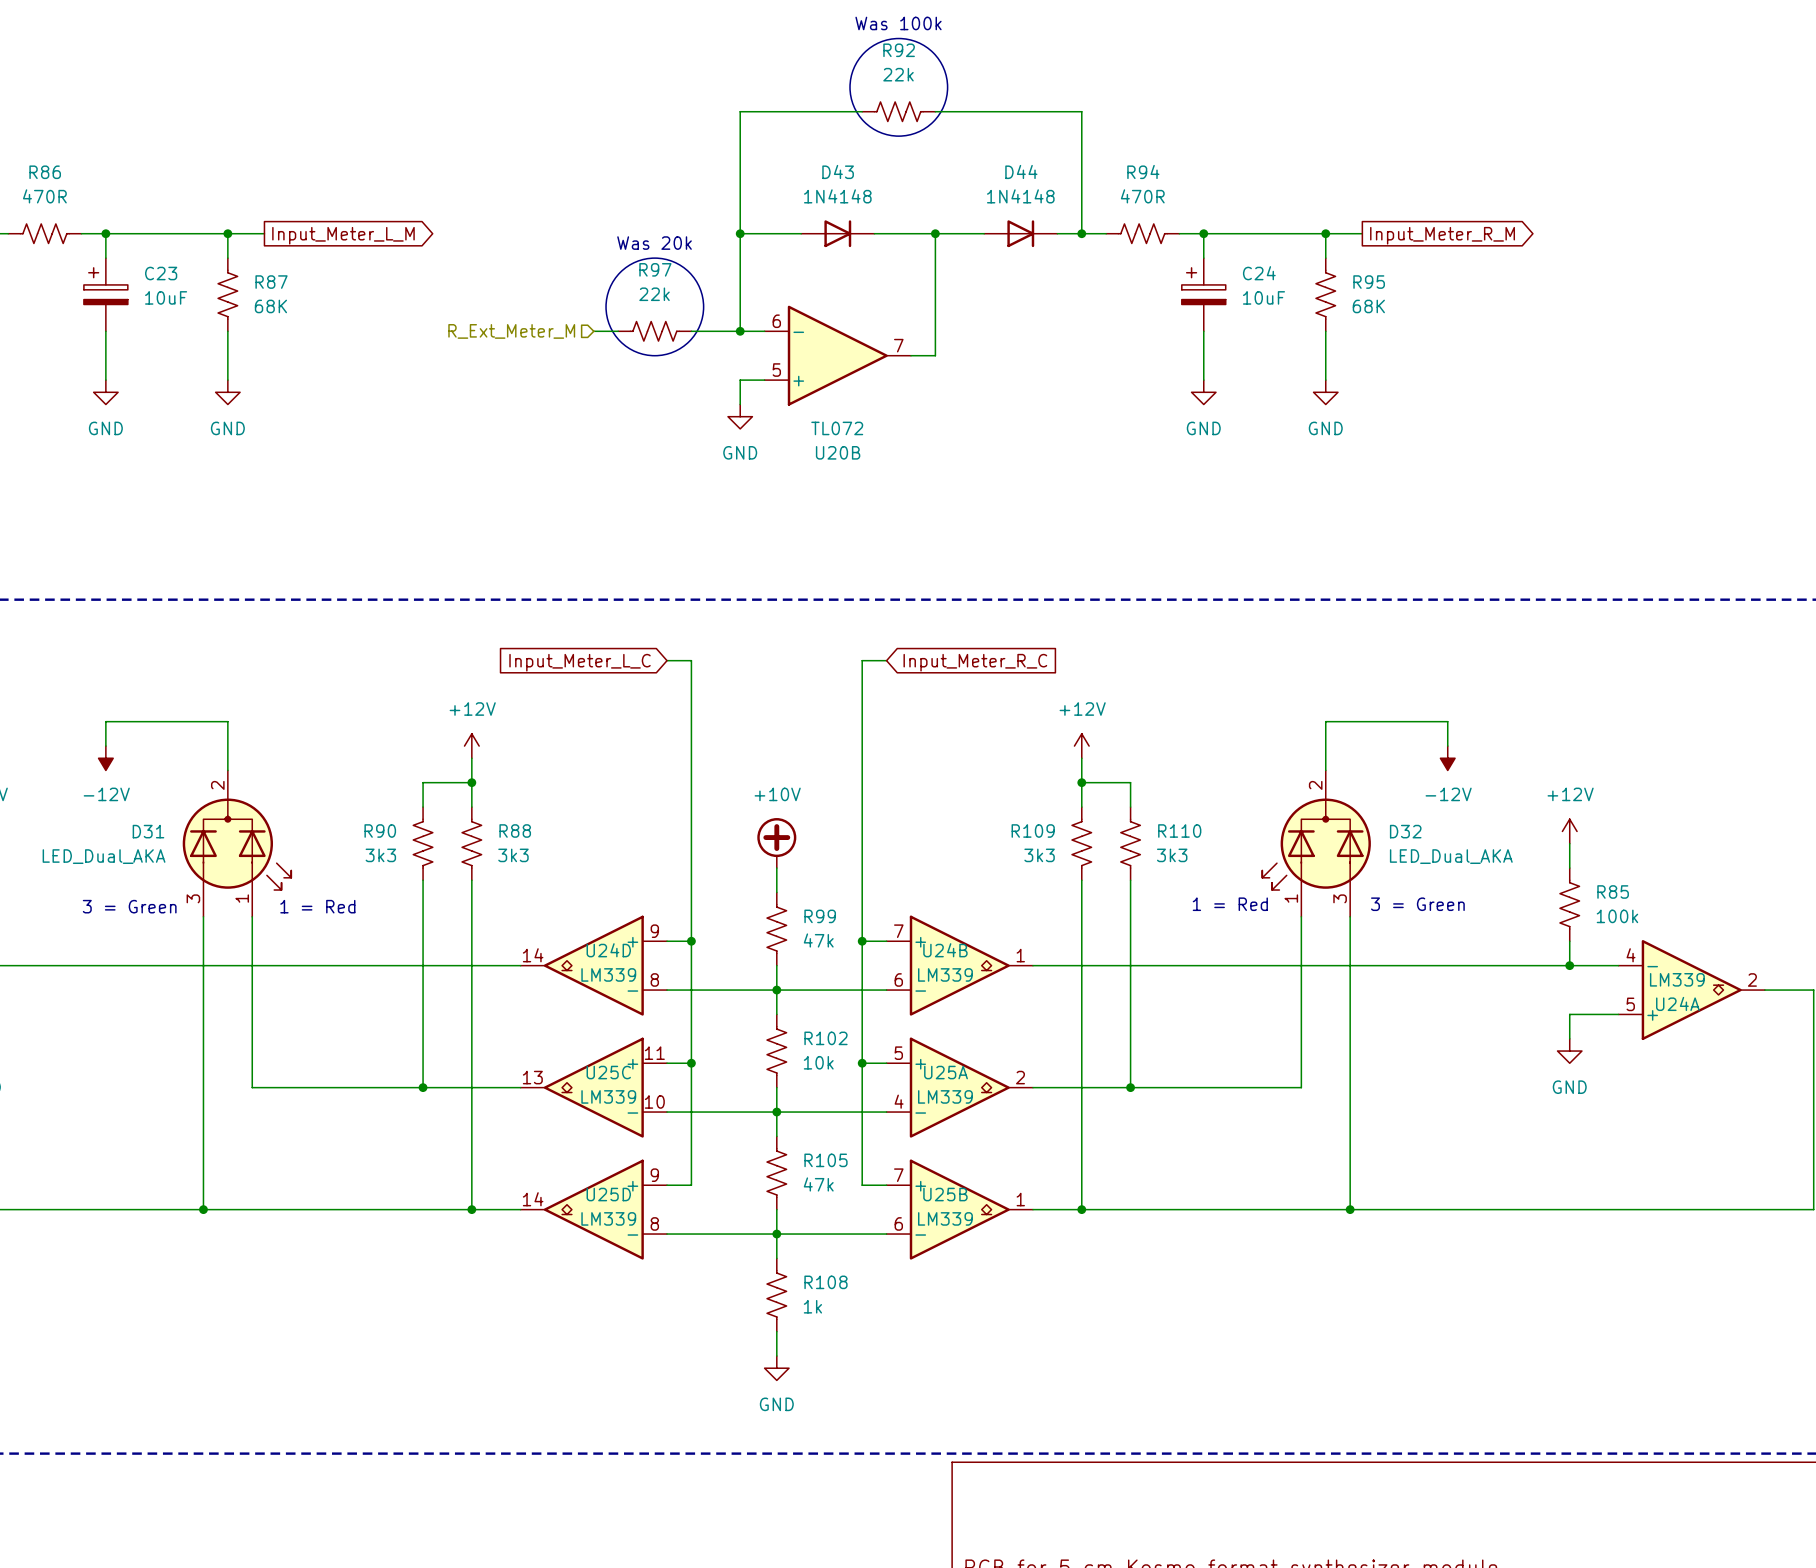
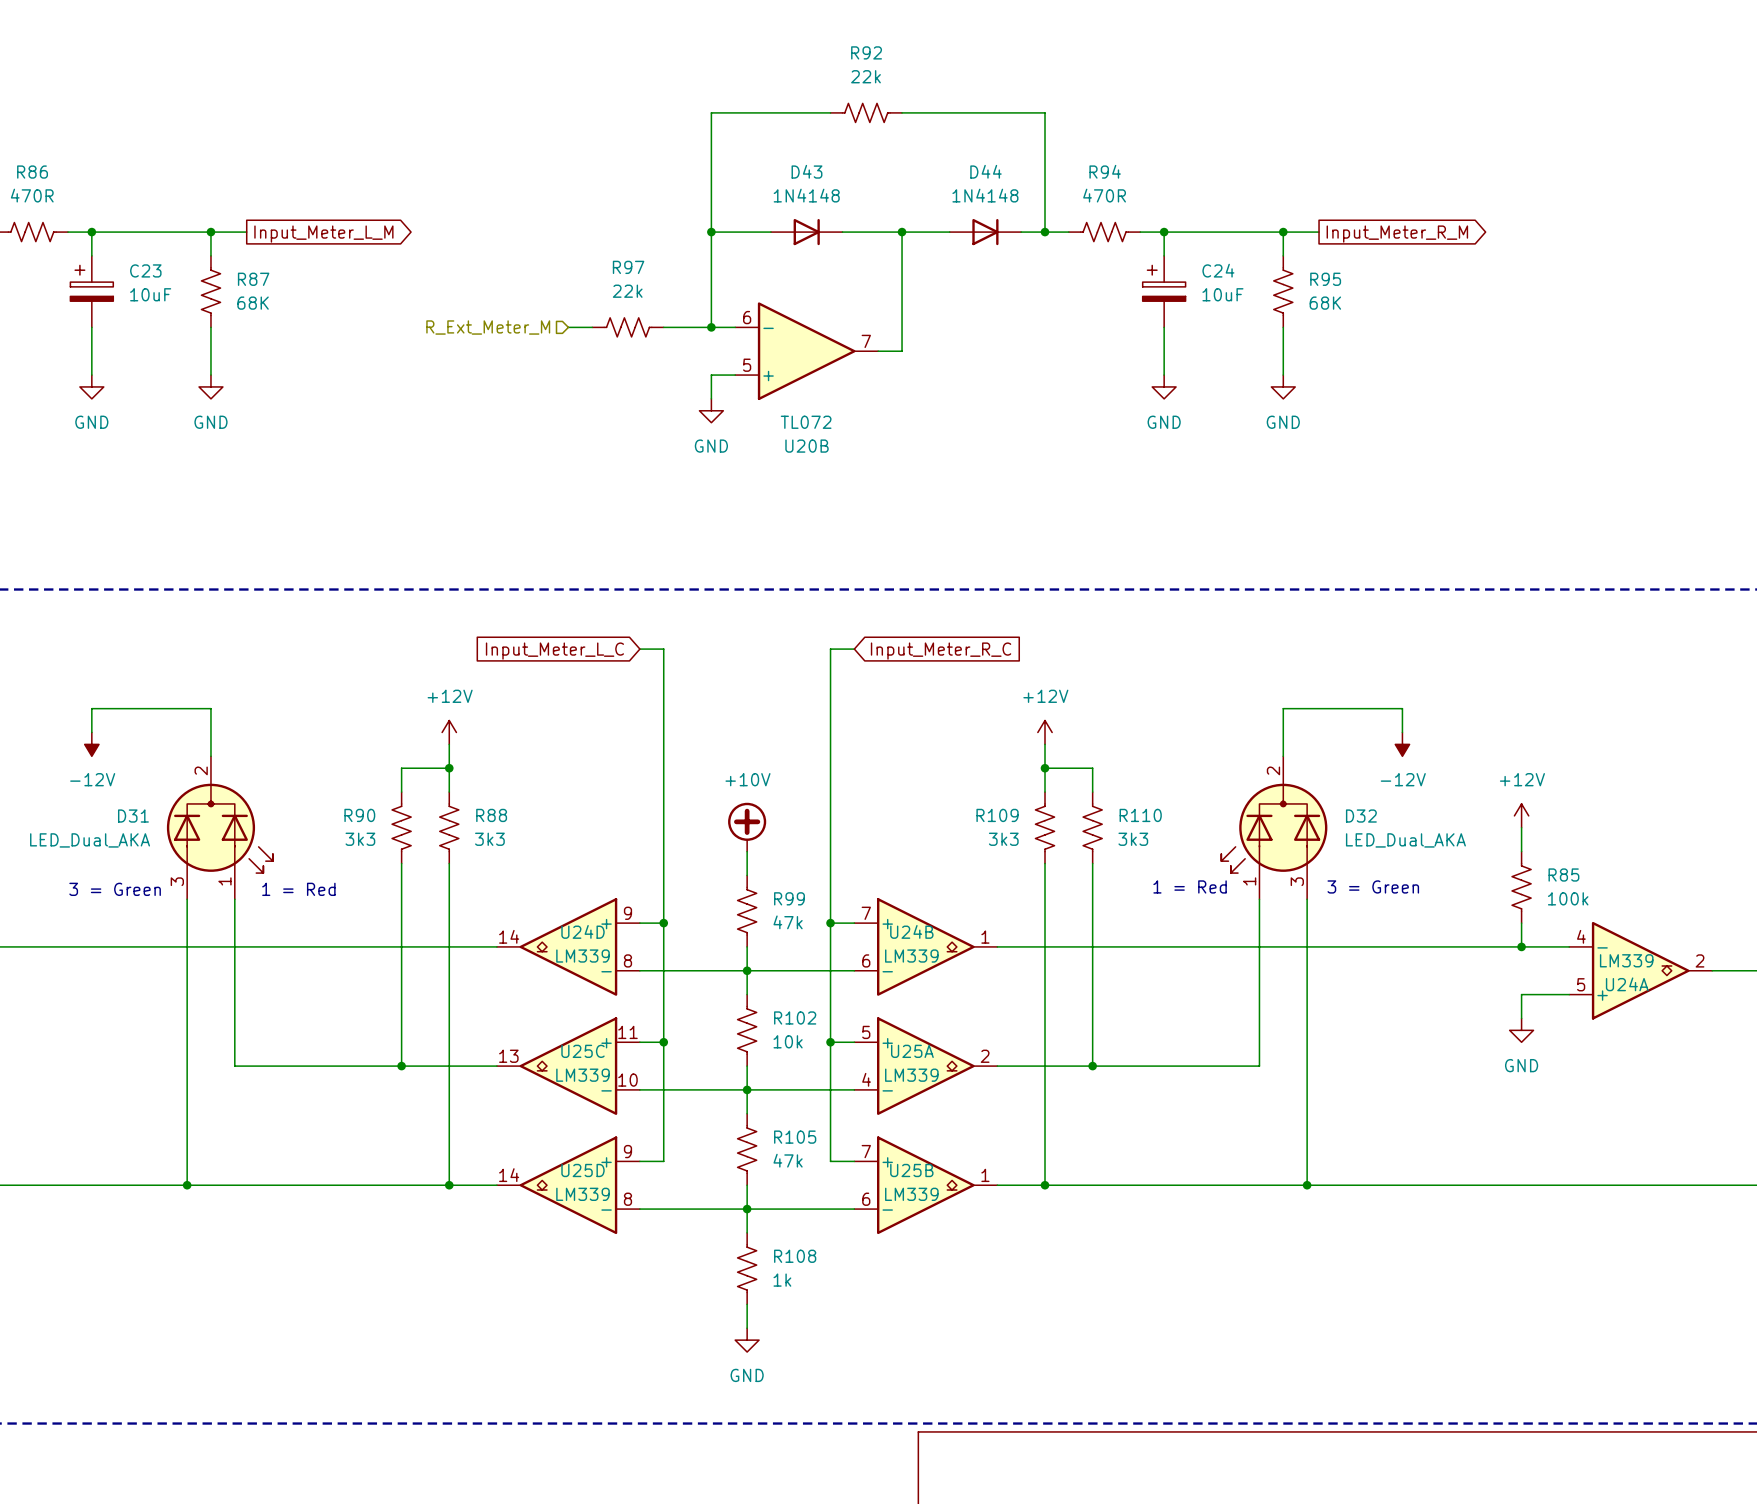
text: Was 100k (898, 23) -> none
drawing: [850, 38, 948, 137] -> none
text: Was 20k (654, 243) -> none
drawing: [606, 258, 704, 356] -> none

